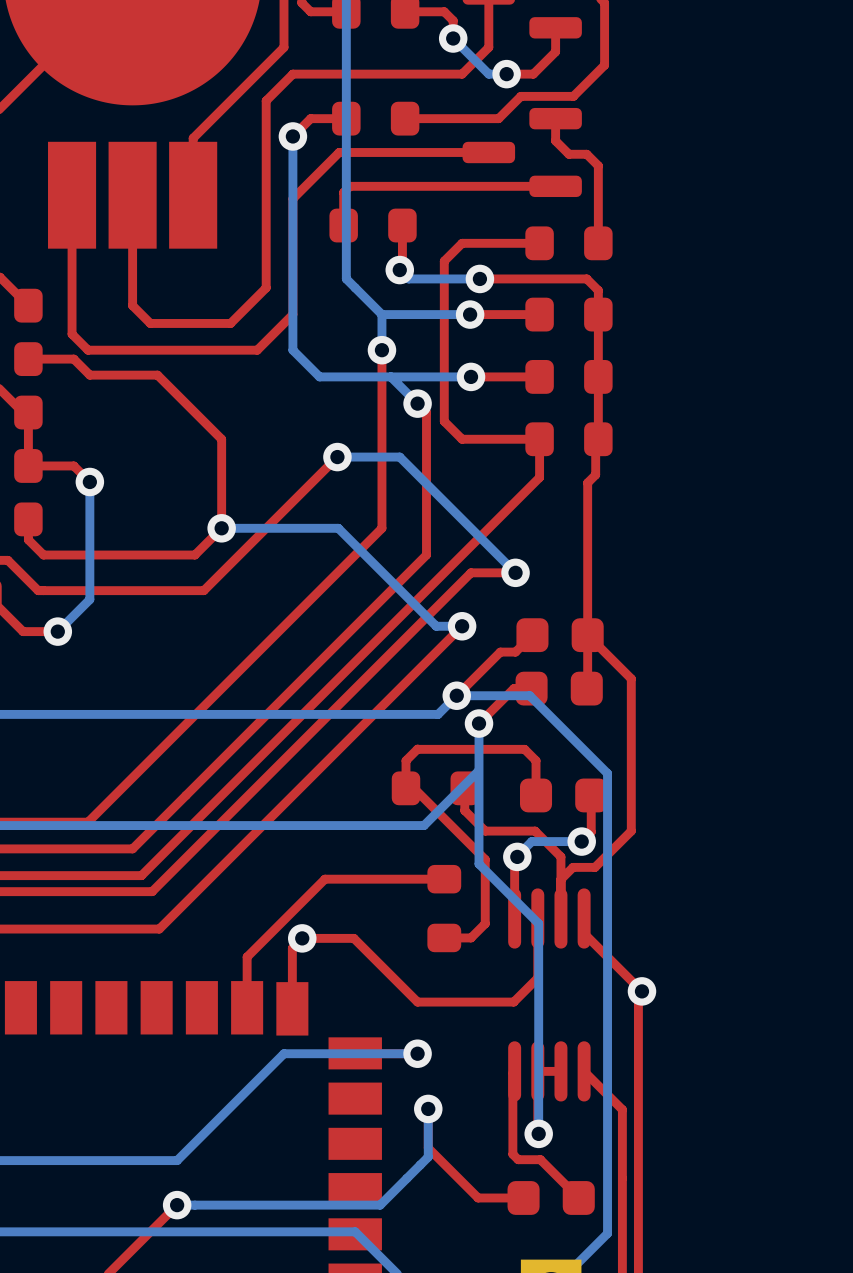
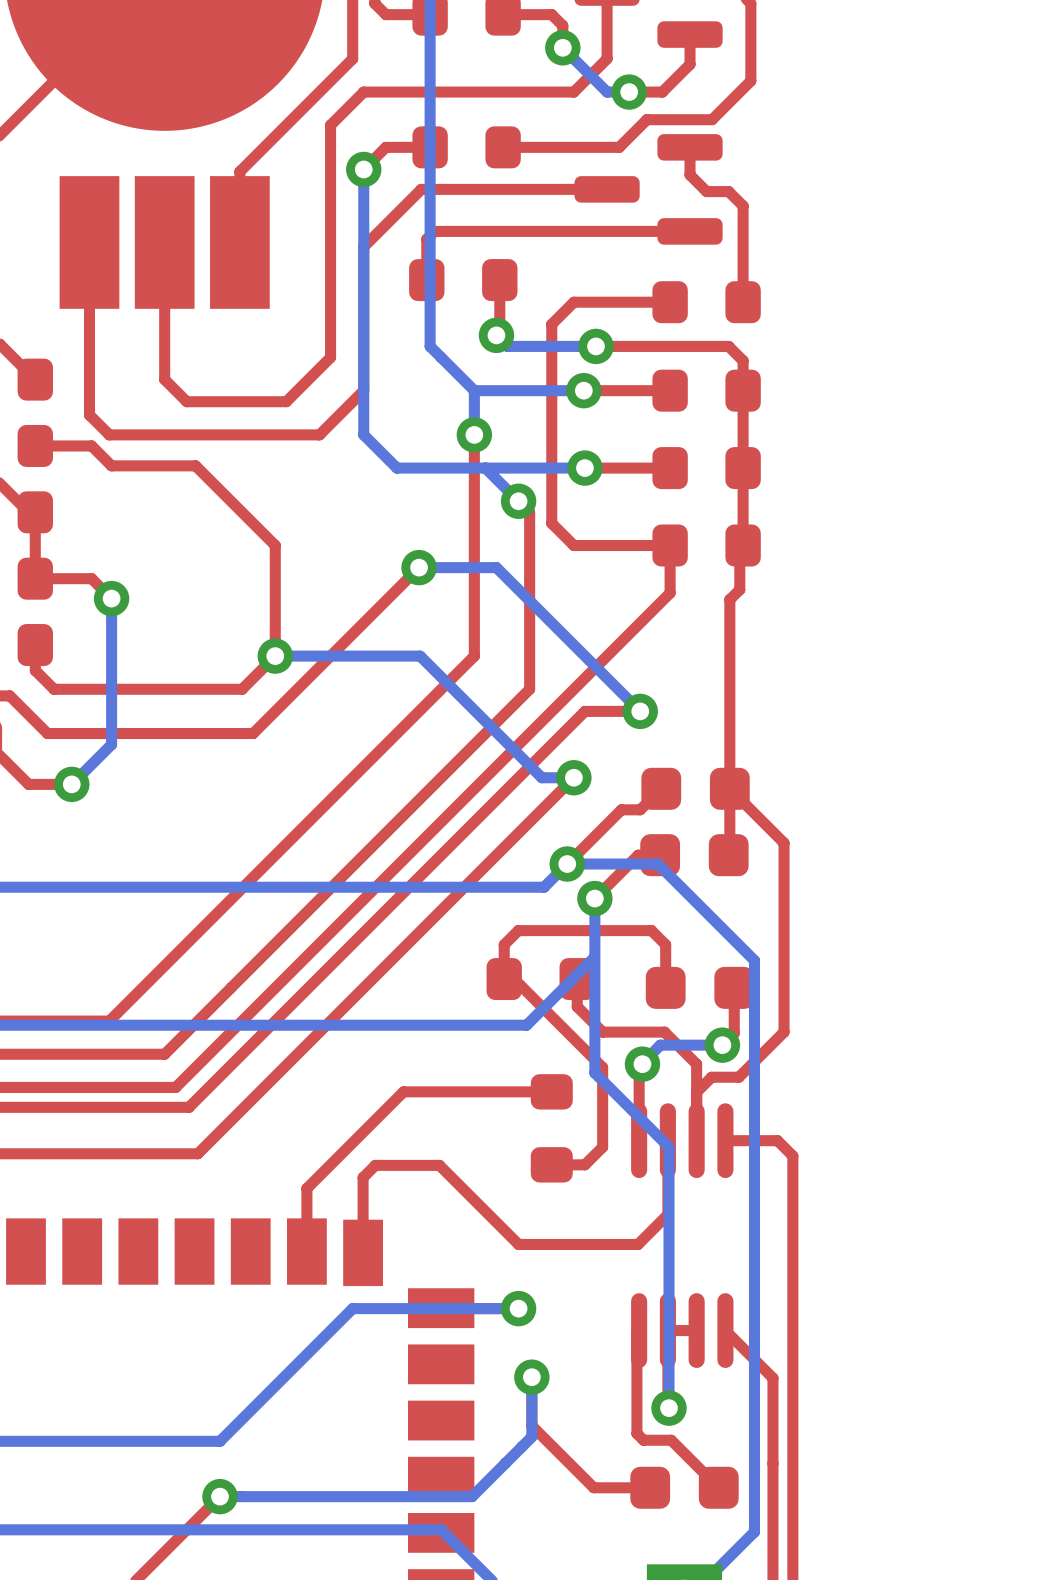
top track: (584, 933) (641, 991) (638, 994) -> (725, 1140) (777, 1140) (792, 1155) (792, 1235)
via: (302, 938) -> none
via: (641, 991) -> none

